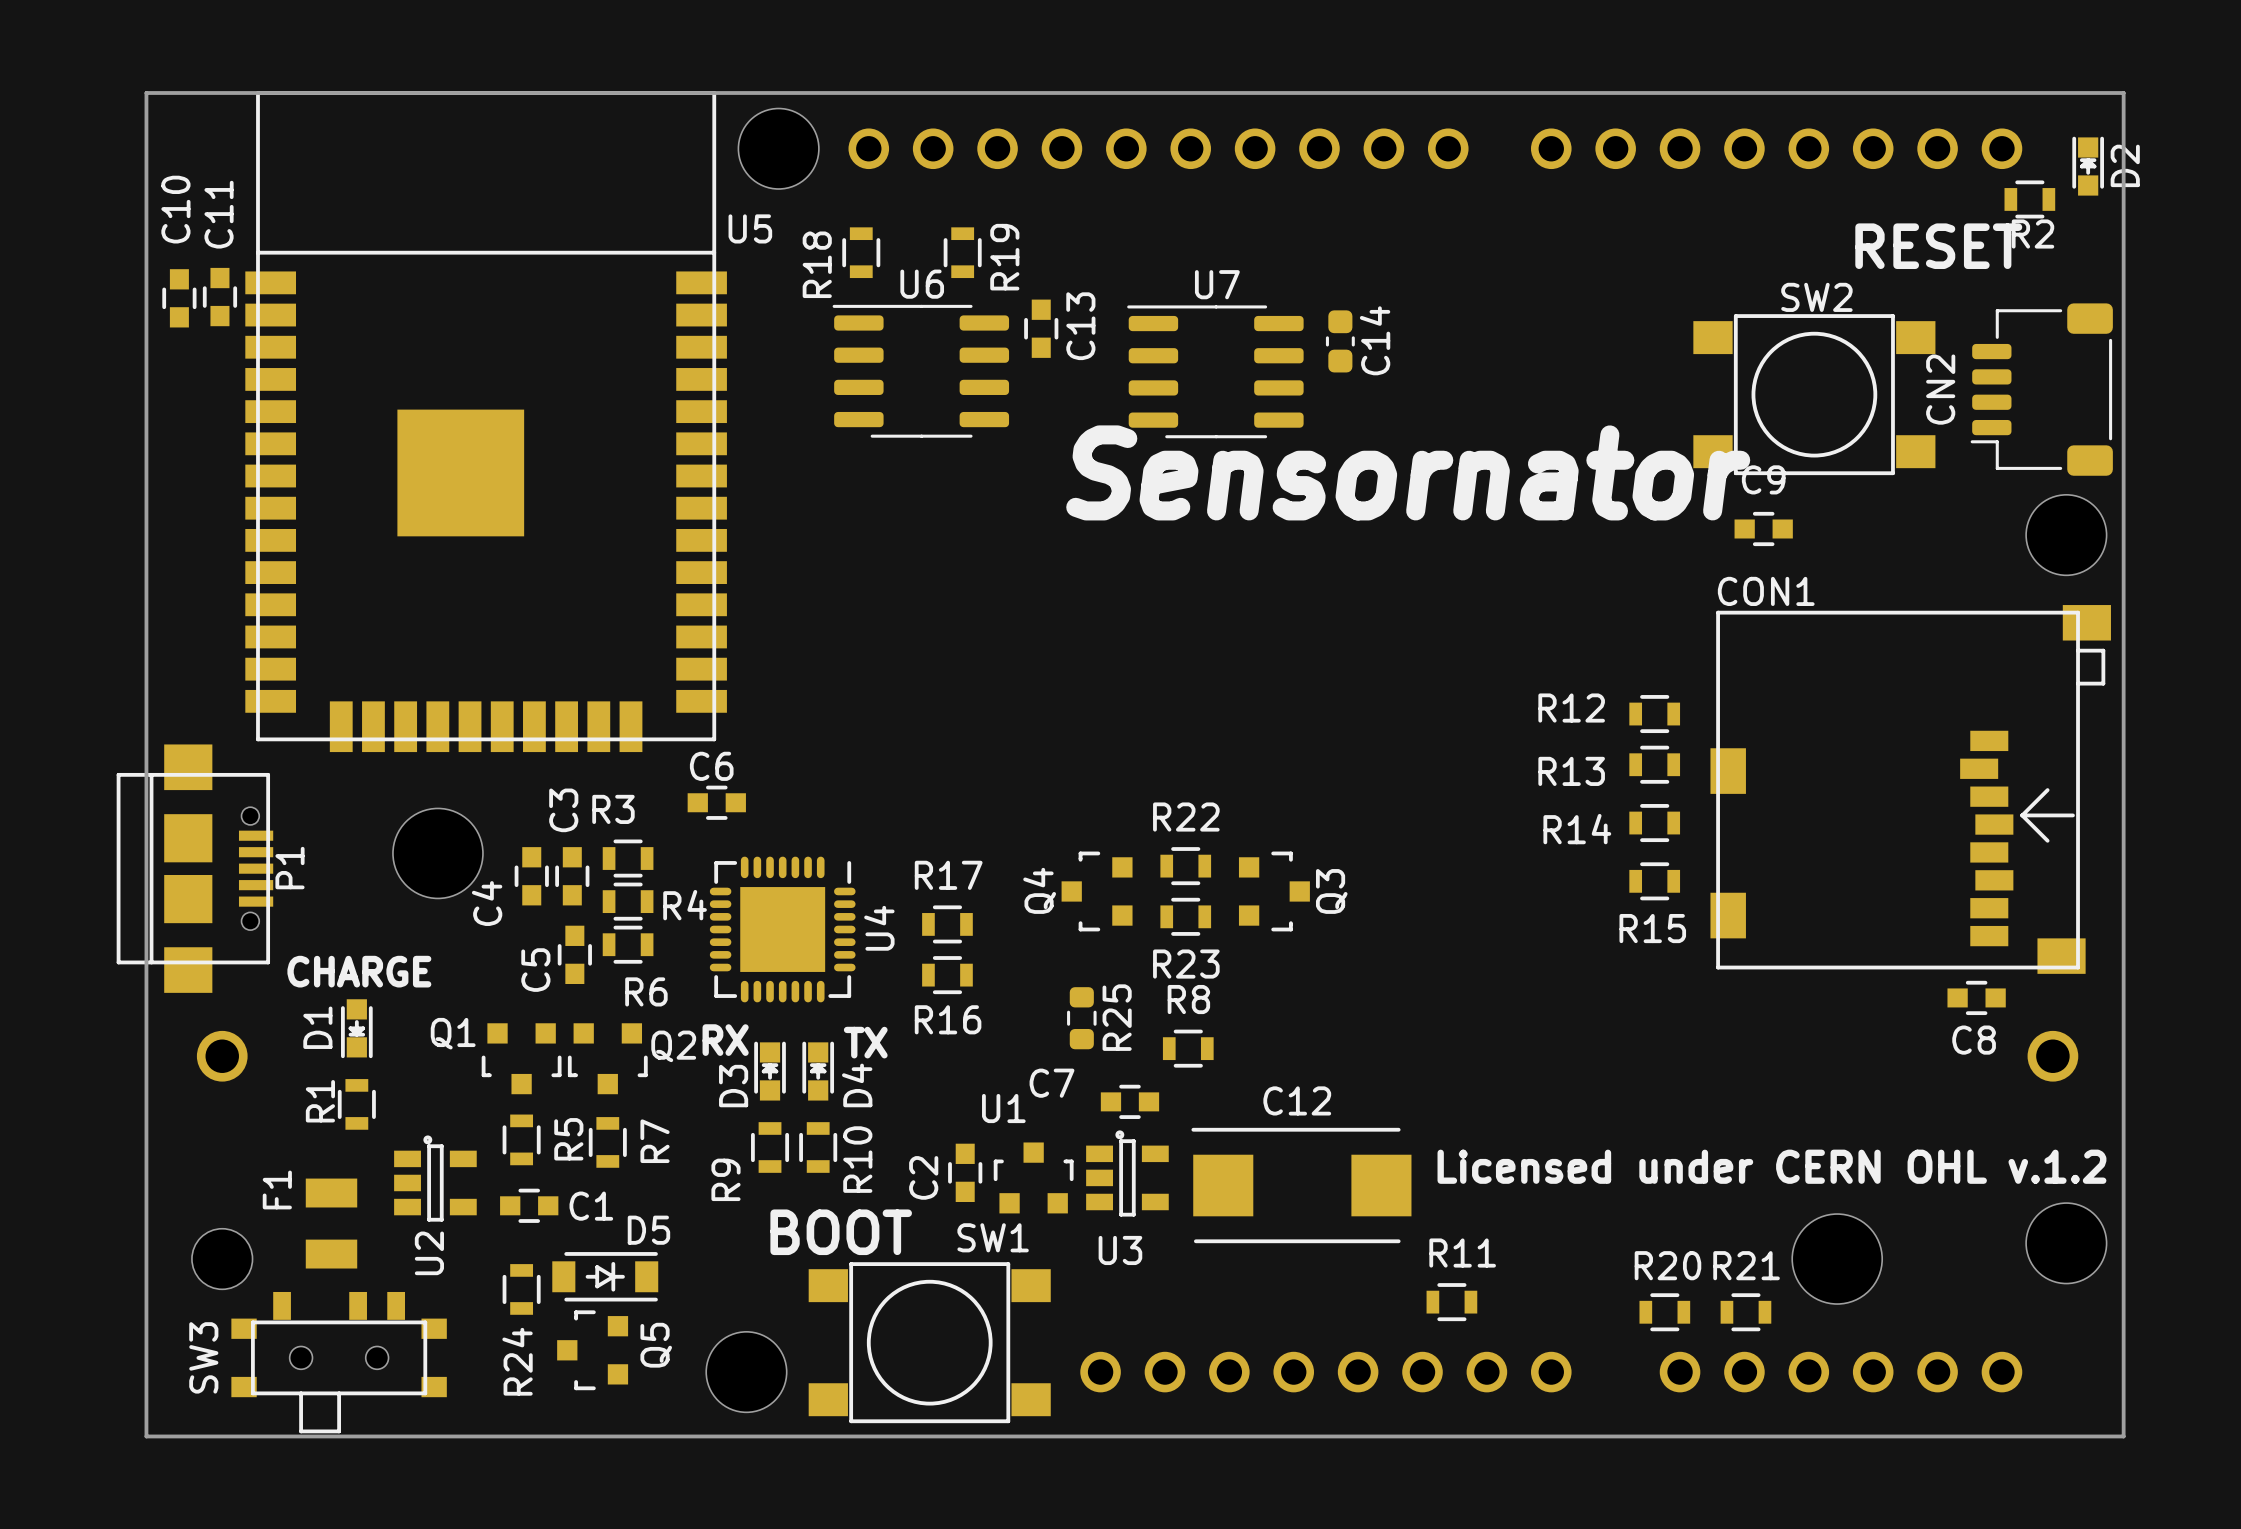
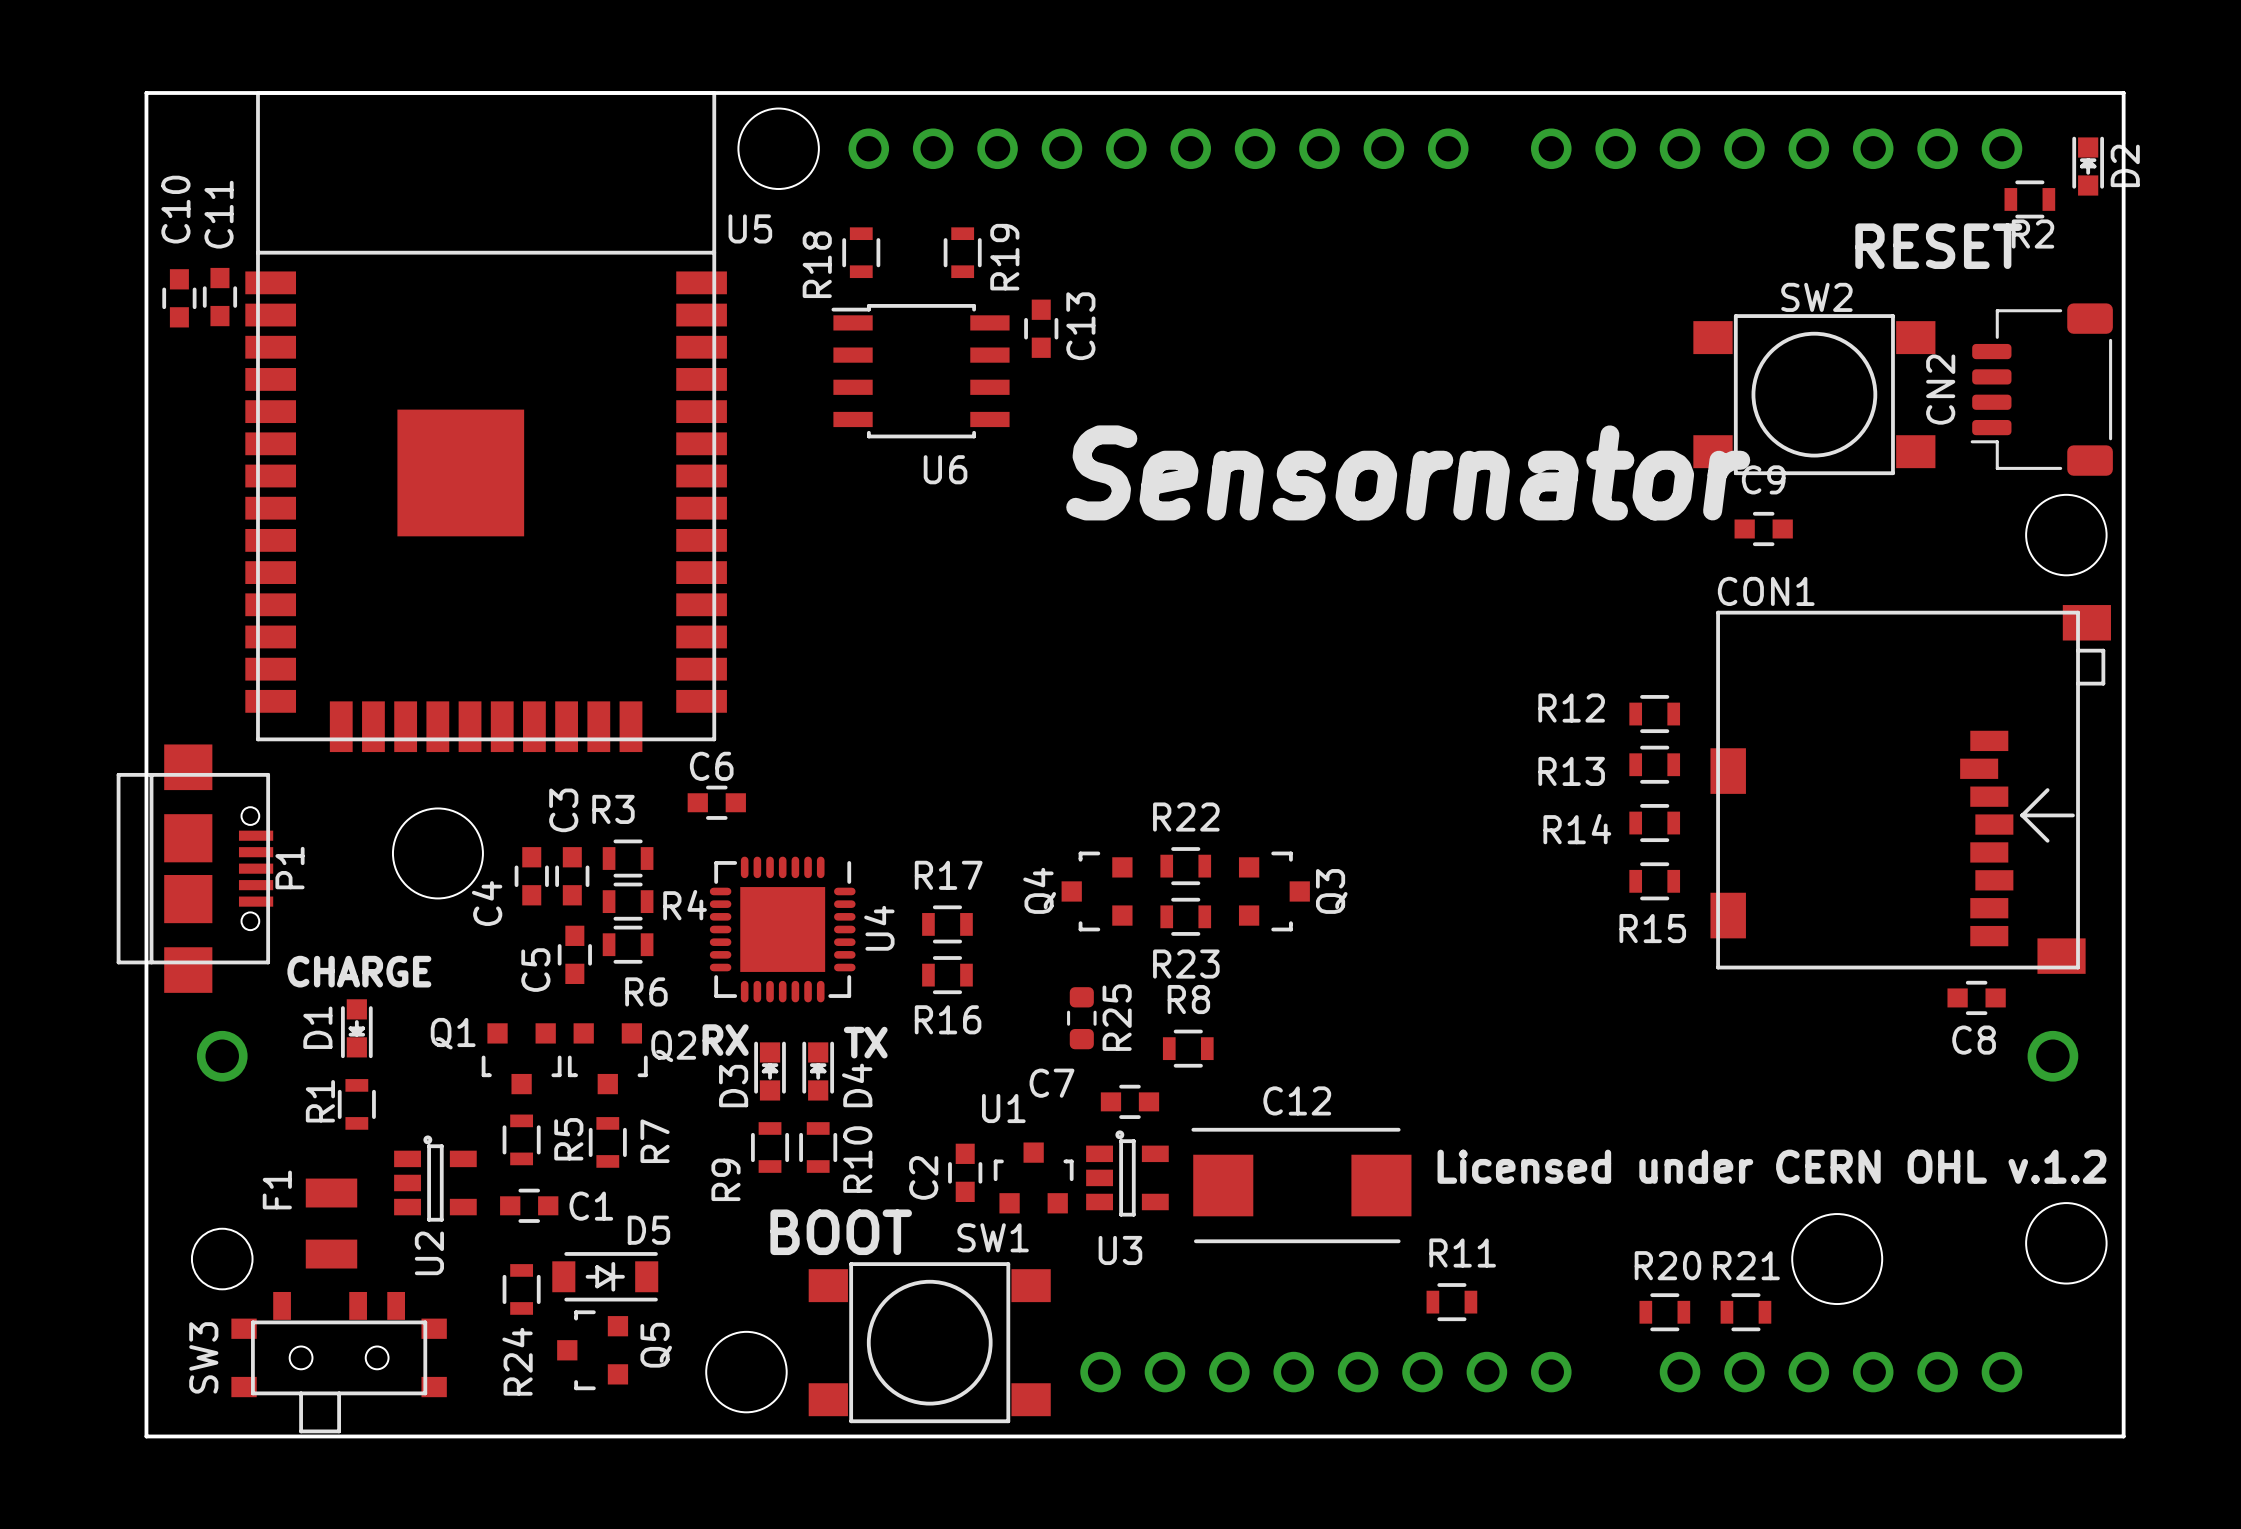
U6 name position: U6 (922, 284) -> U6 (945, 469)
U6 footprint: [832, 304, 1010, 438] -> [831, 304, 1010, 439]
C14: (1340, 341) -> none
U7: (1215, 371) -> none

